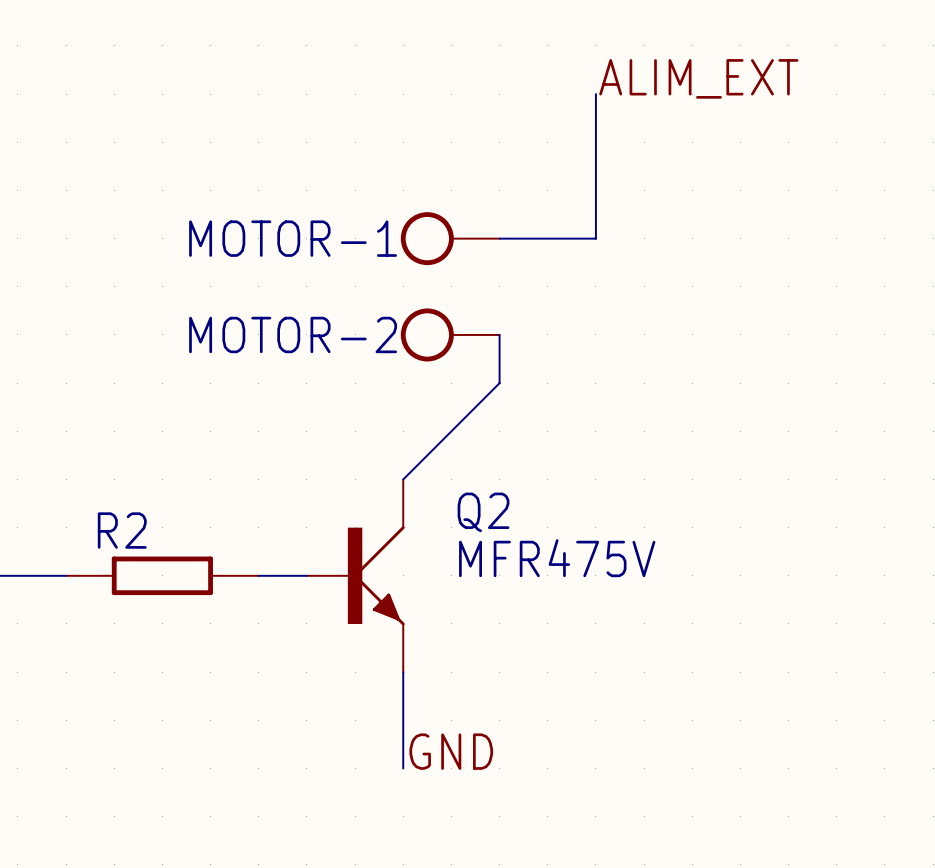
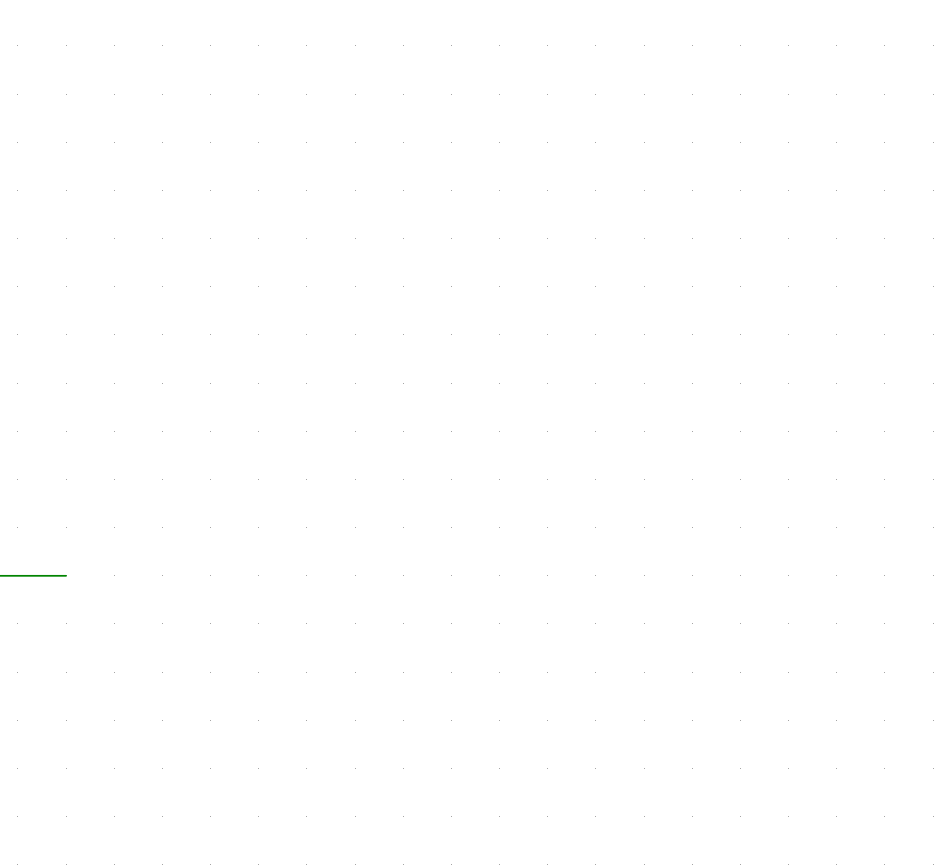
label: ALIM_EXT (698, 78) -> none
wire: (595, 94) (595, 238) (499, 238) -> none
MOTOR-1: (450, 238) -> none
MOTOR-2: (450, 334) -> none
wire: (499, 334) (499, 383) (403, 479) -> none
R2: (162, 575) -> none
wire: (258, 575) (306, 575) -> none
Q2: MFR475V (355, 575) -> none
wire: (403, 672) (403, 768) -> none
label: GND (451, 751) -> none

